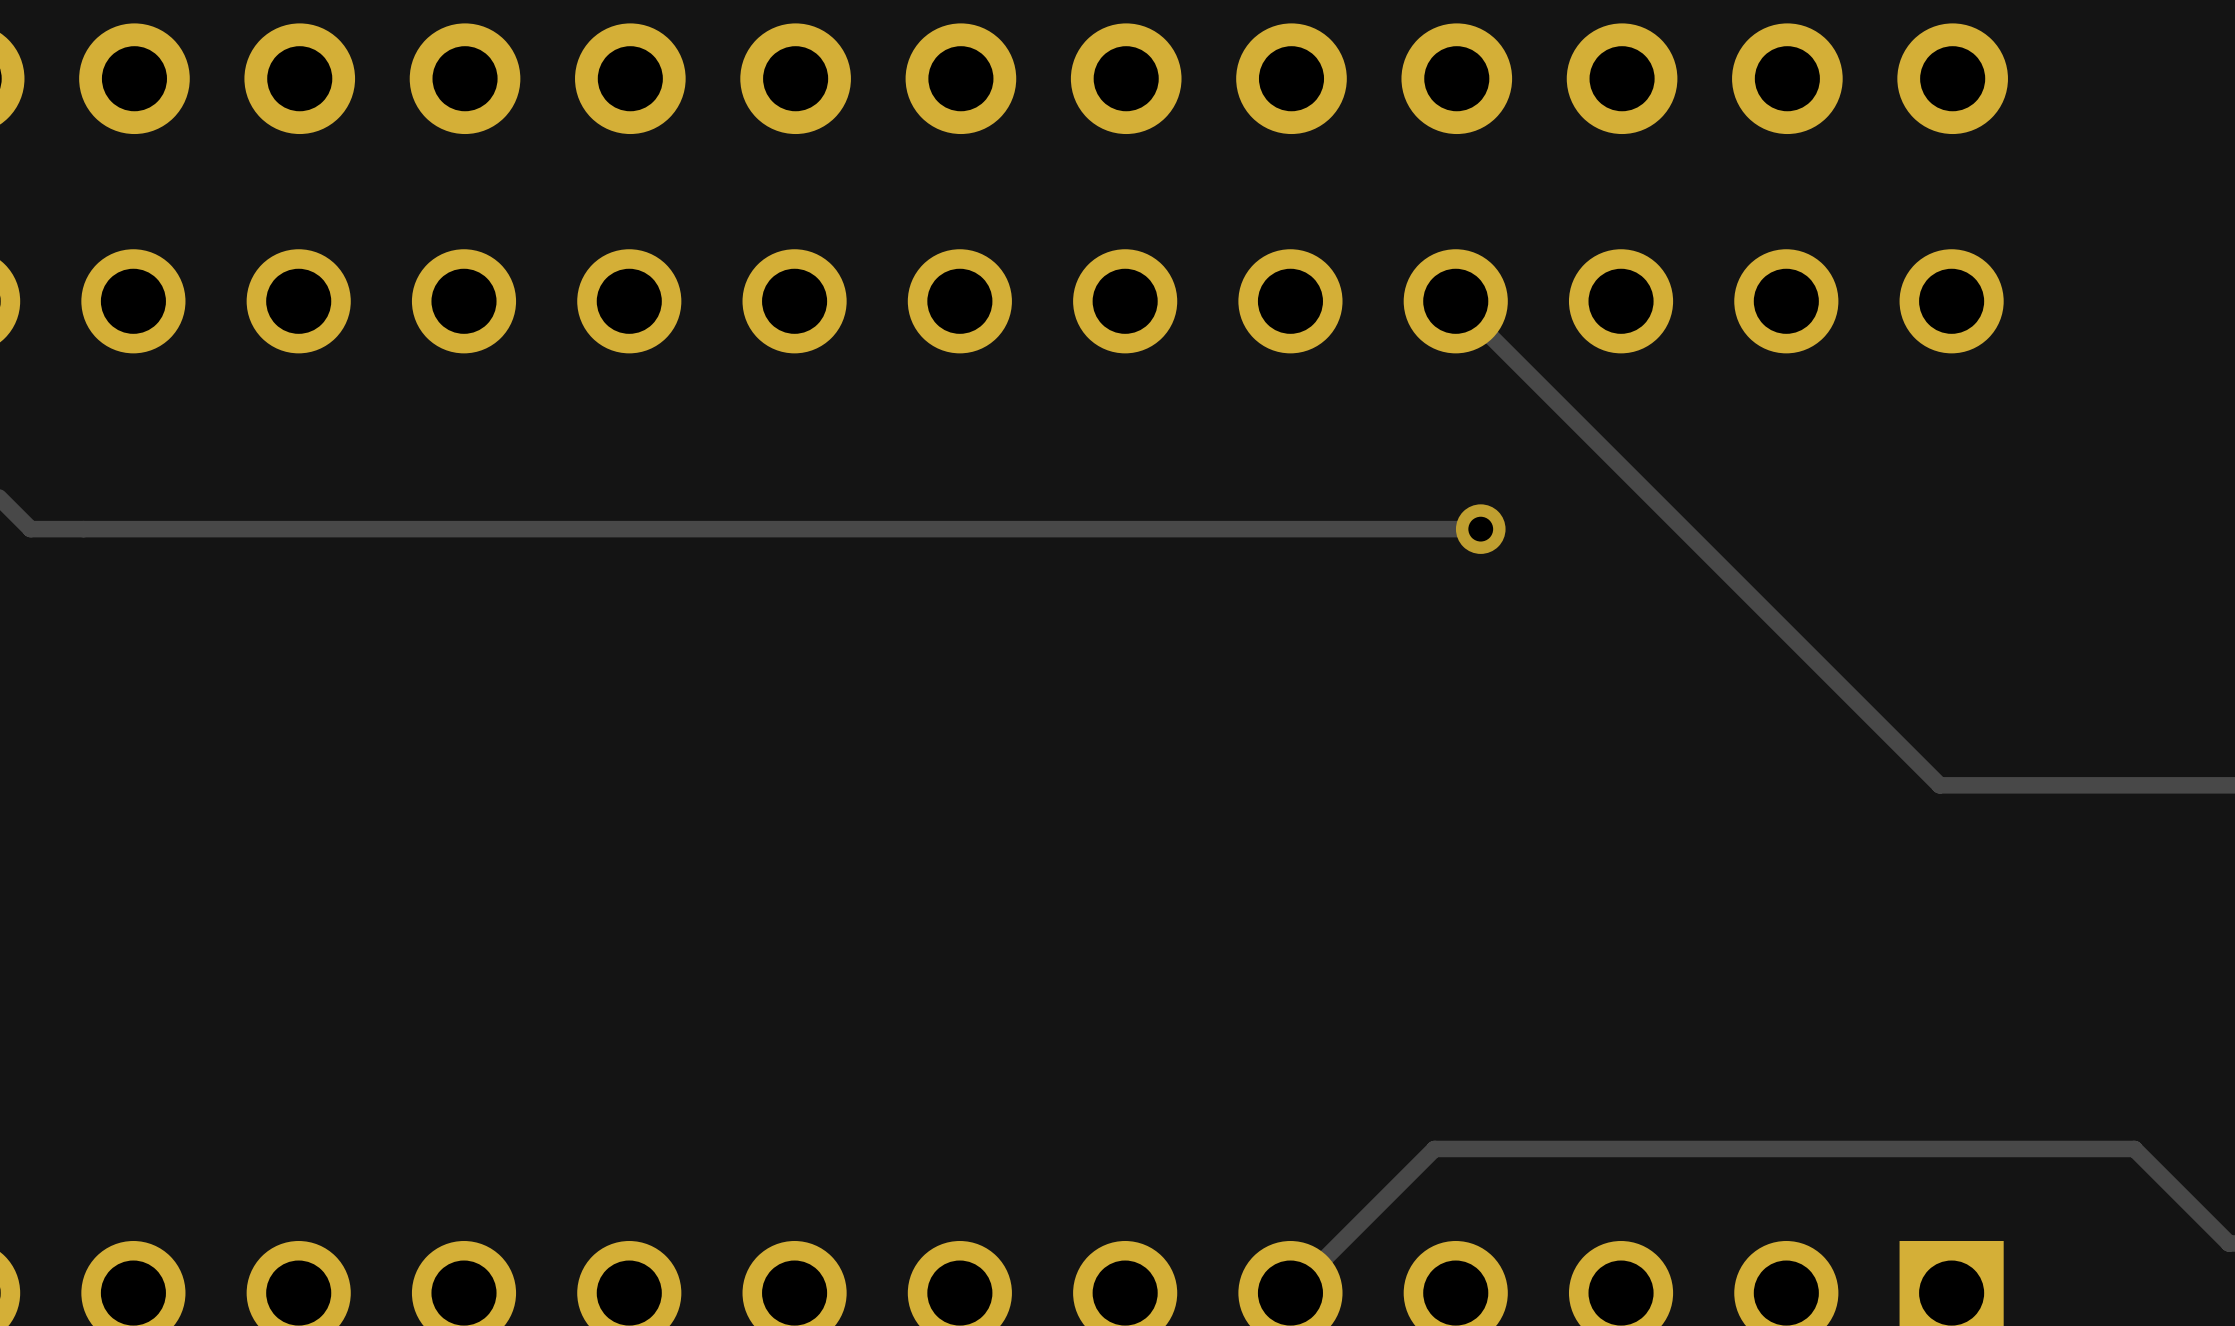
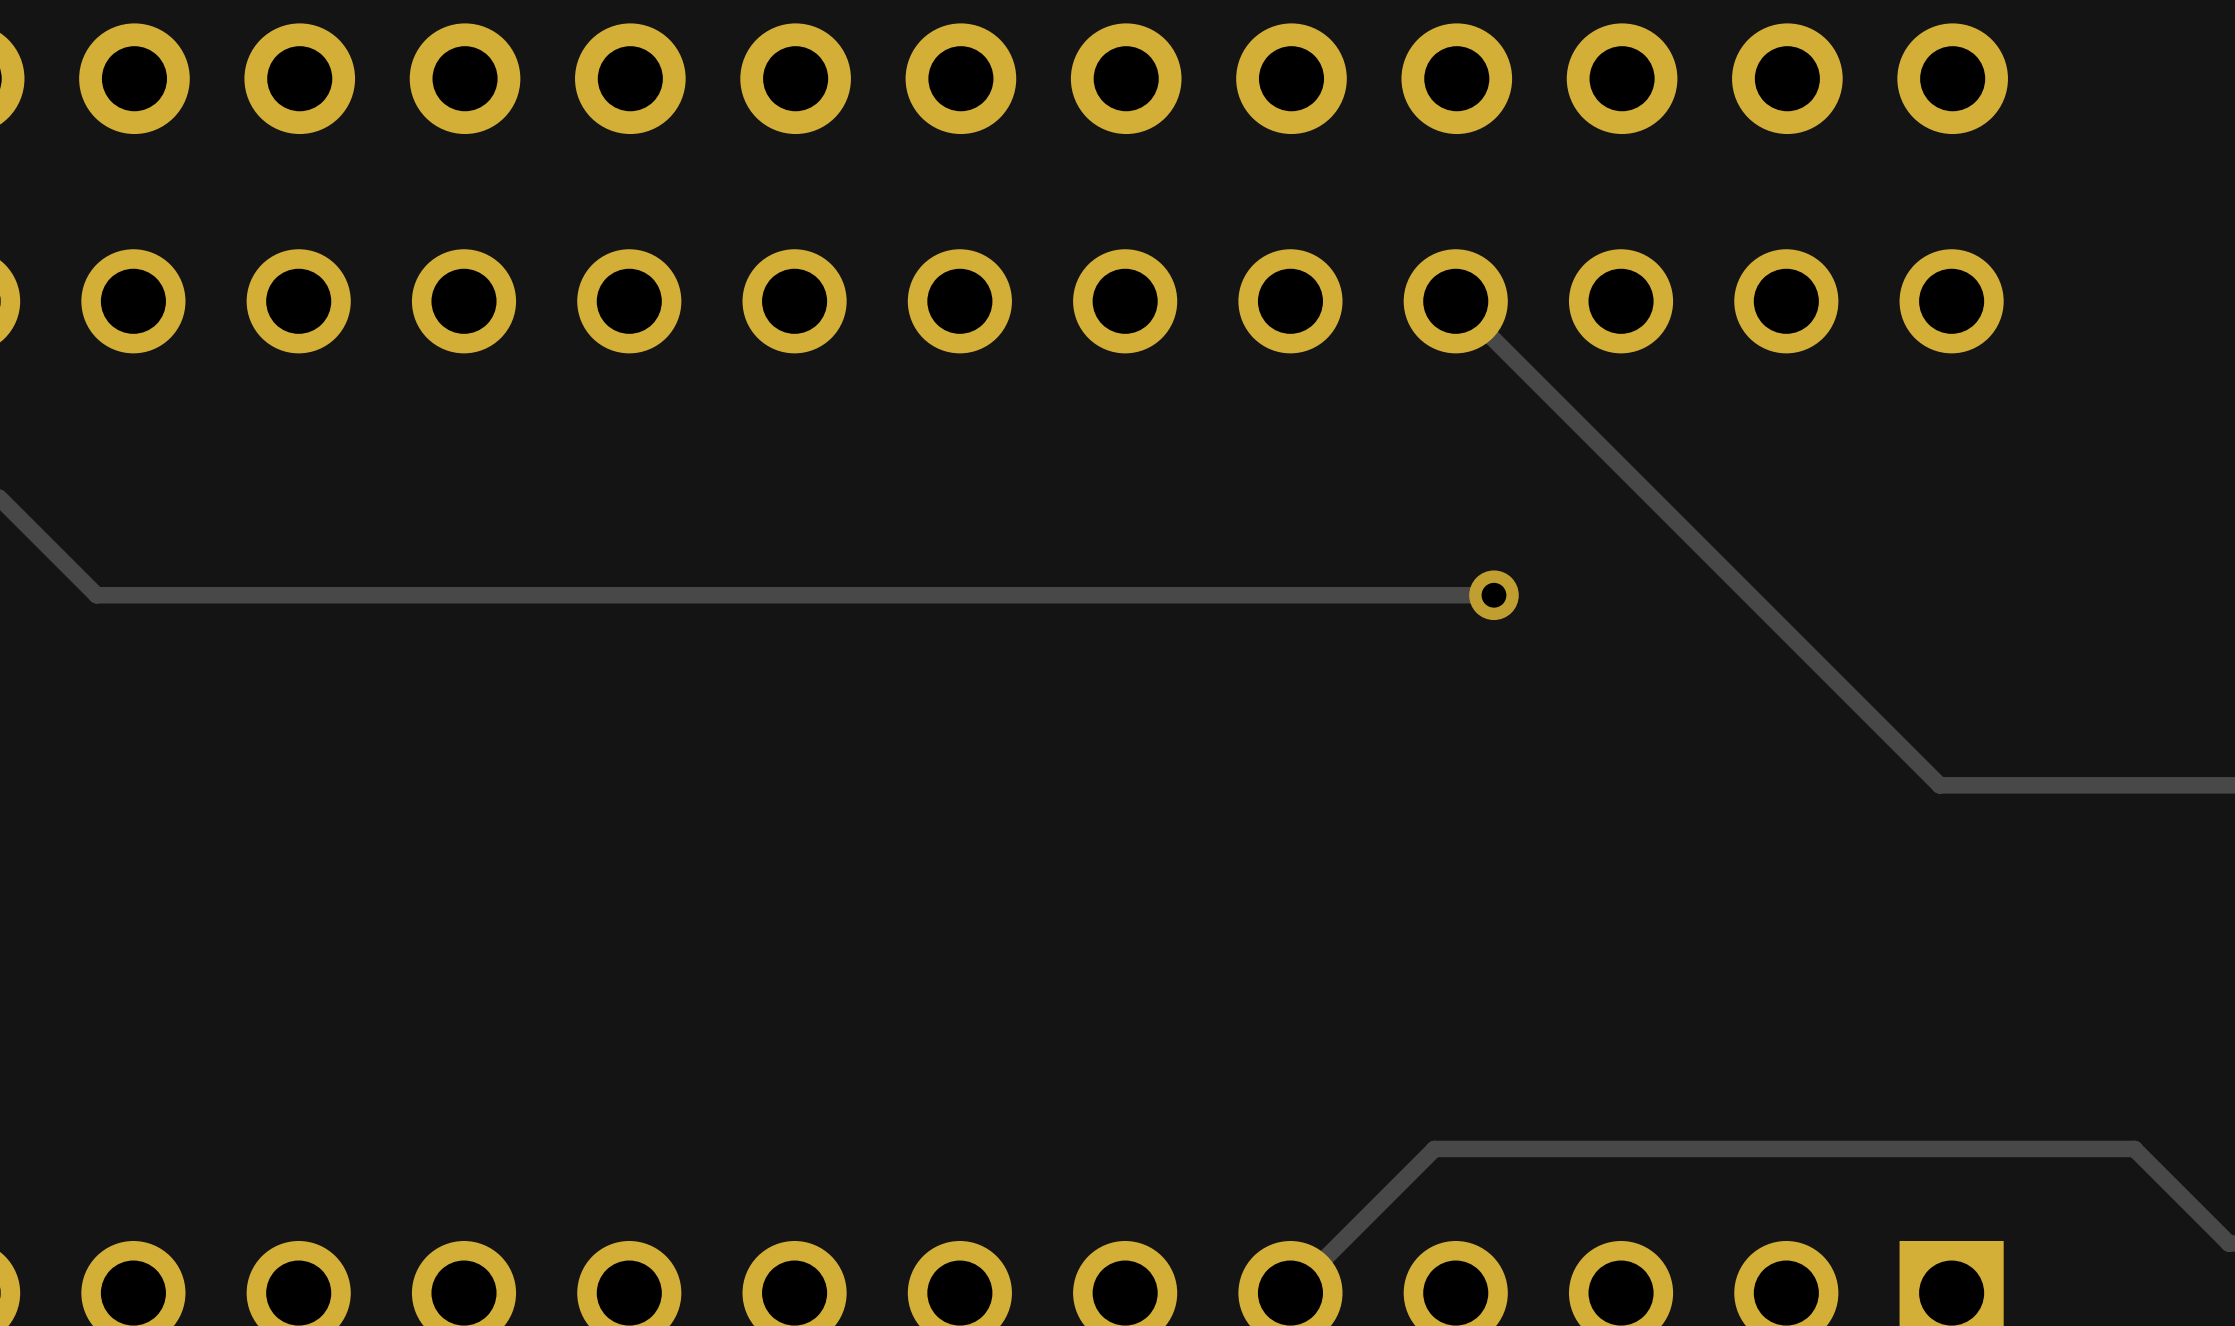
track: (1480, 529) (30, 529) -> (1493, 595) (96, 595) (30, 529)
via position: (1480, 529) -> (1493, 595)

